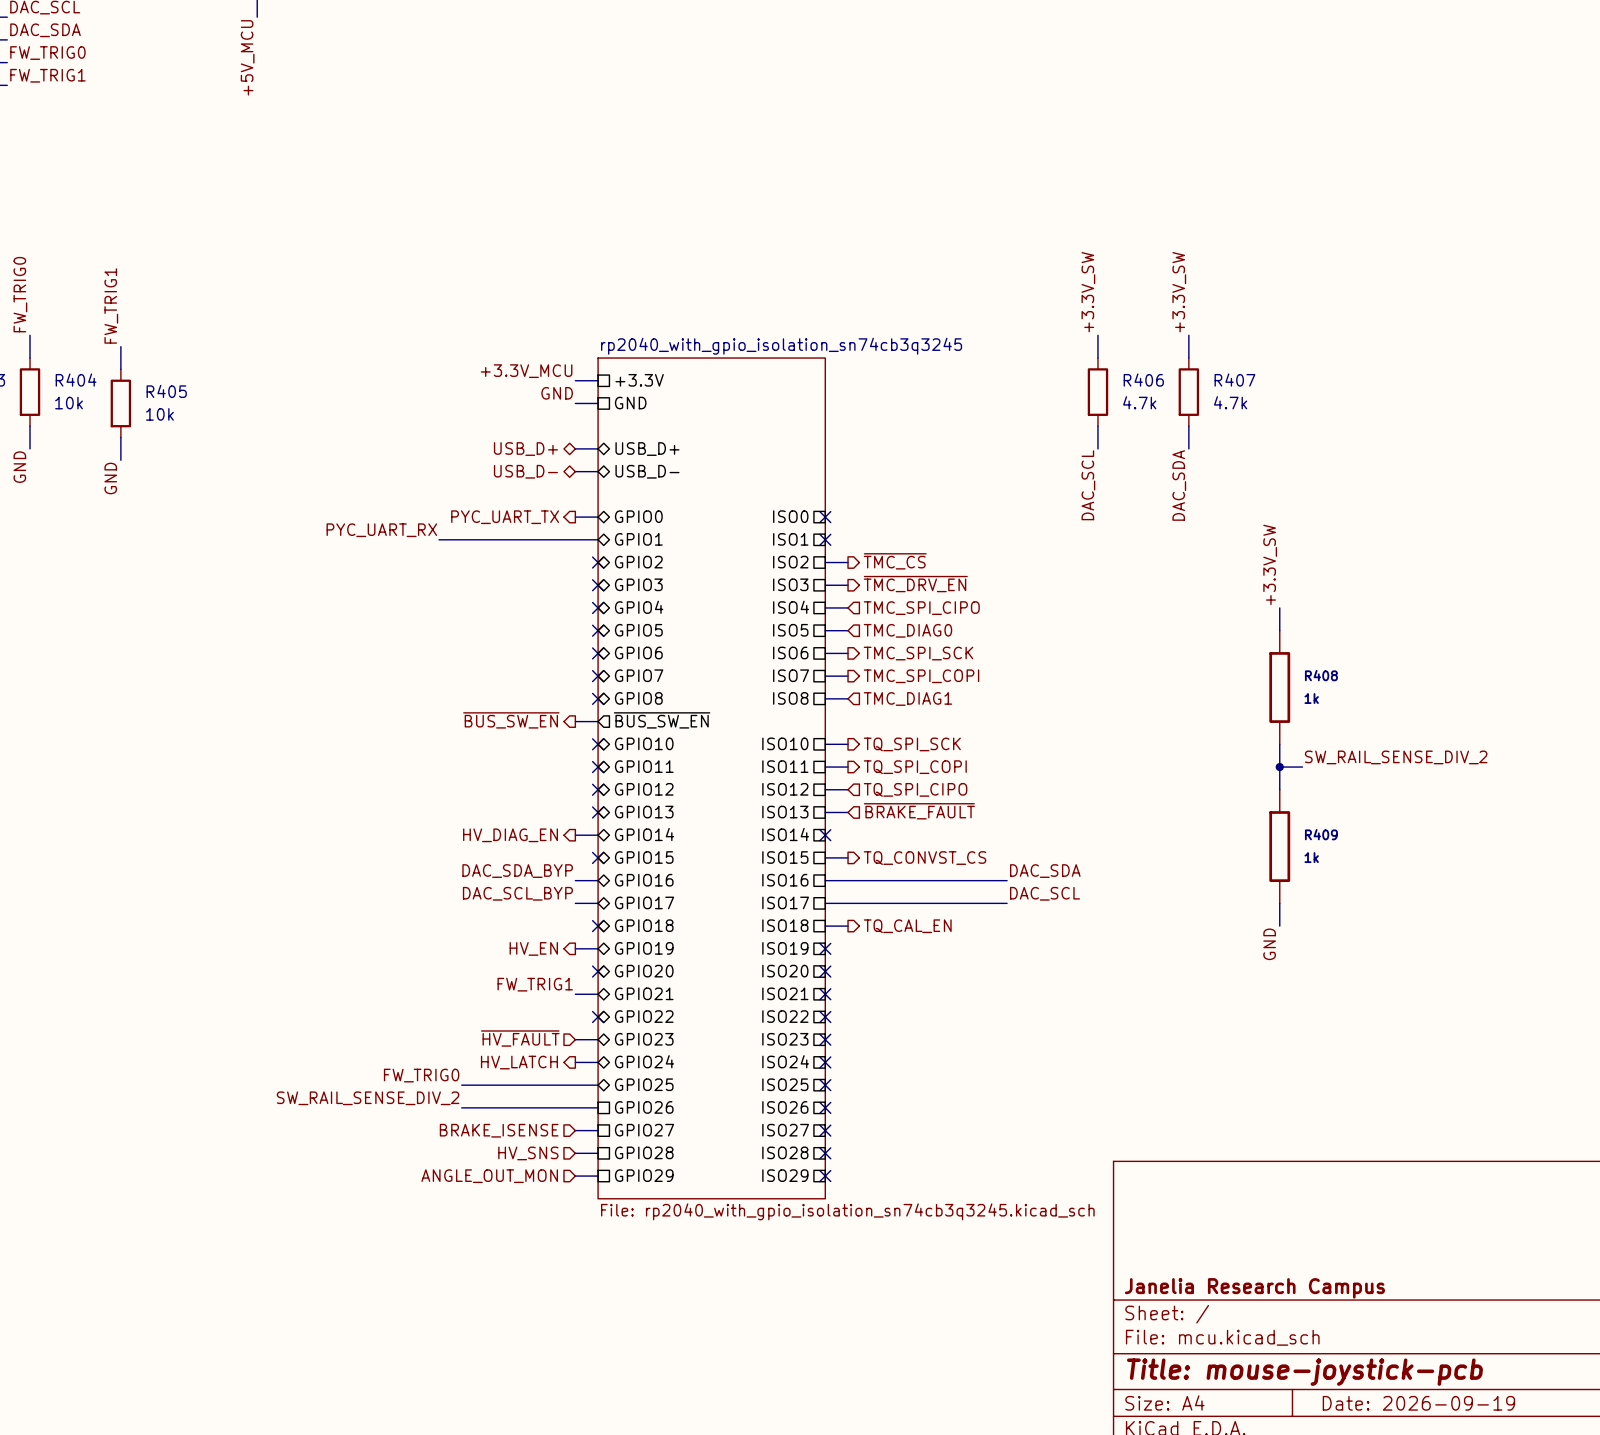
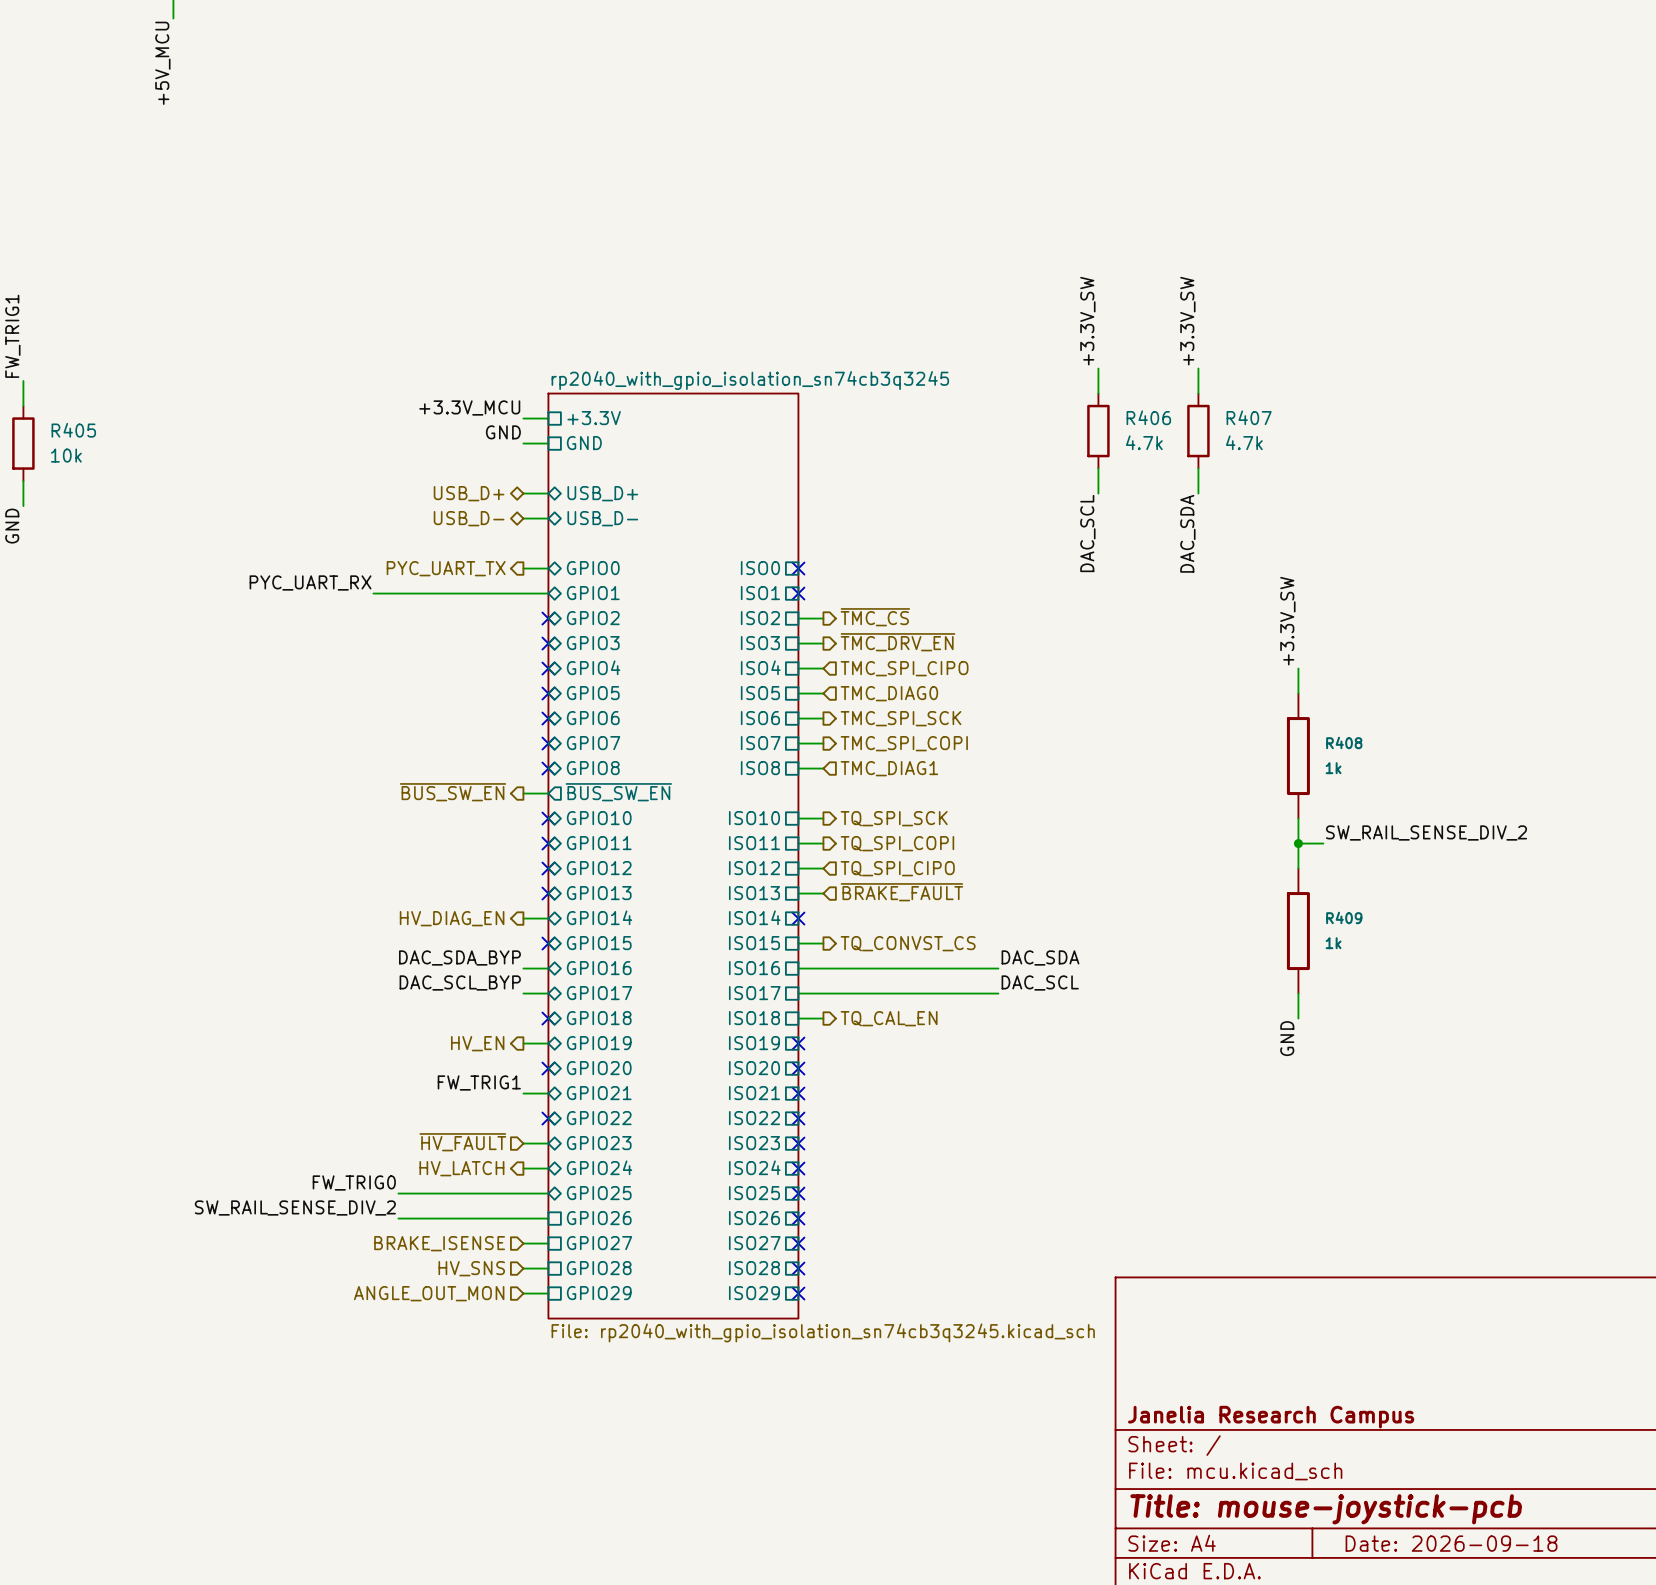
title block: Date: 2026-09-19 (1418, 1403) -> Date: 2026-09-18 (1451, 1543)

